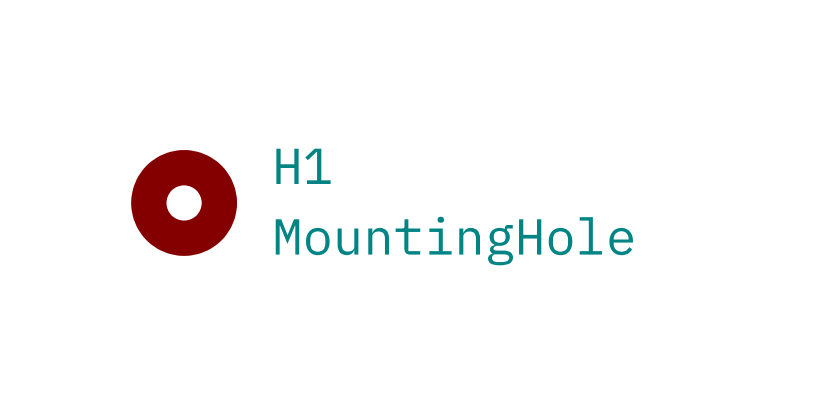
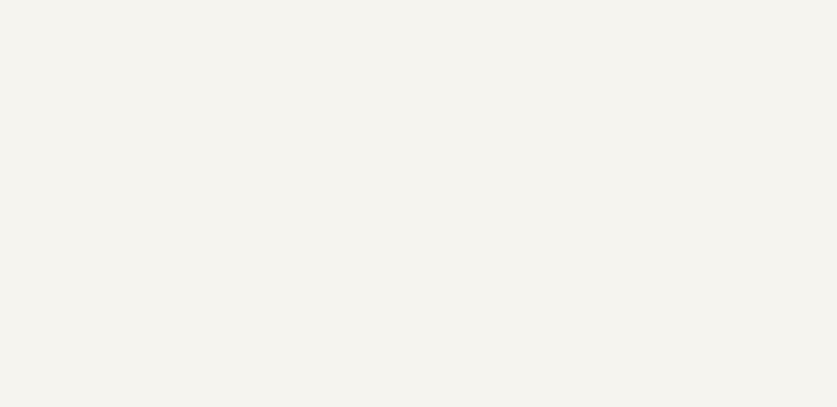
H1: MountingHole (184, 202) -> none

